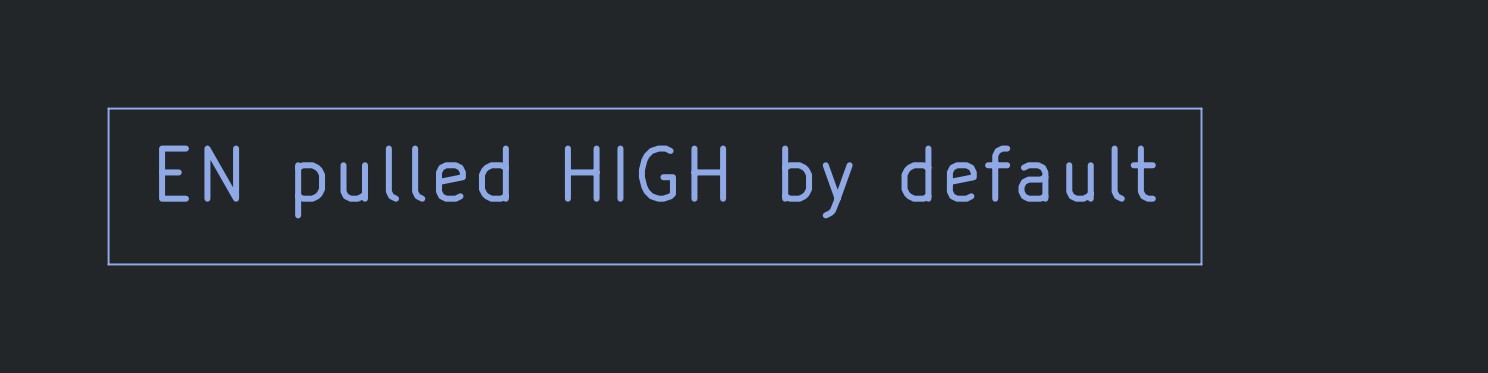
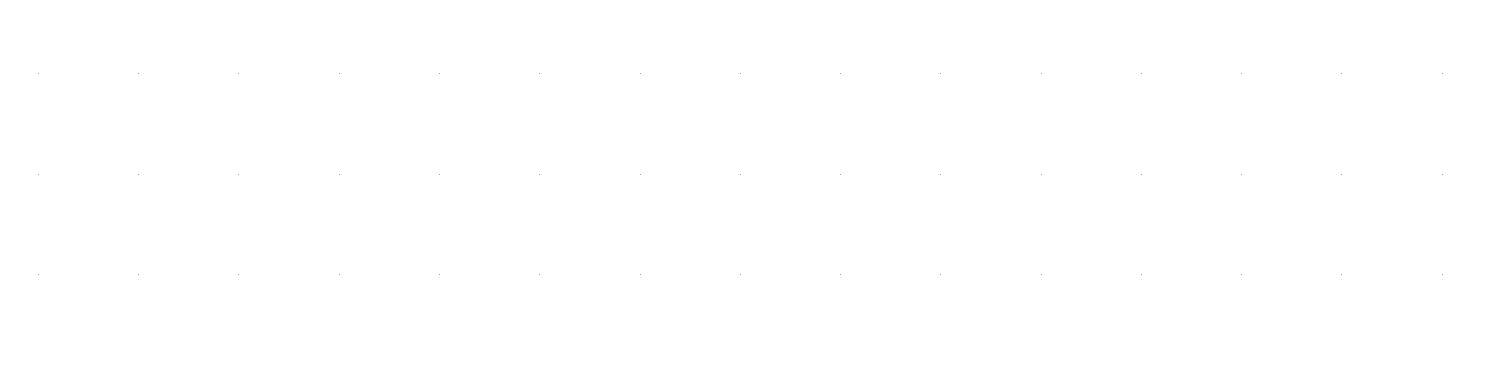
line: (108, 108) (1201, 108) (1201, 264) (108, 264) (108, 108) -> none
text: EN pulled HIGH by default (657, 181) -> none

